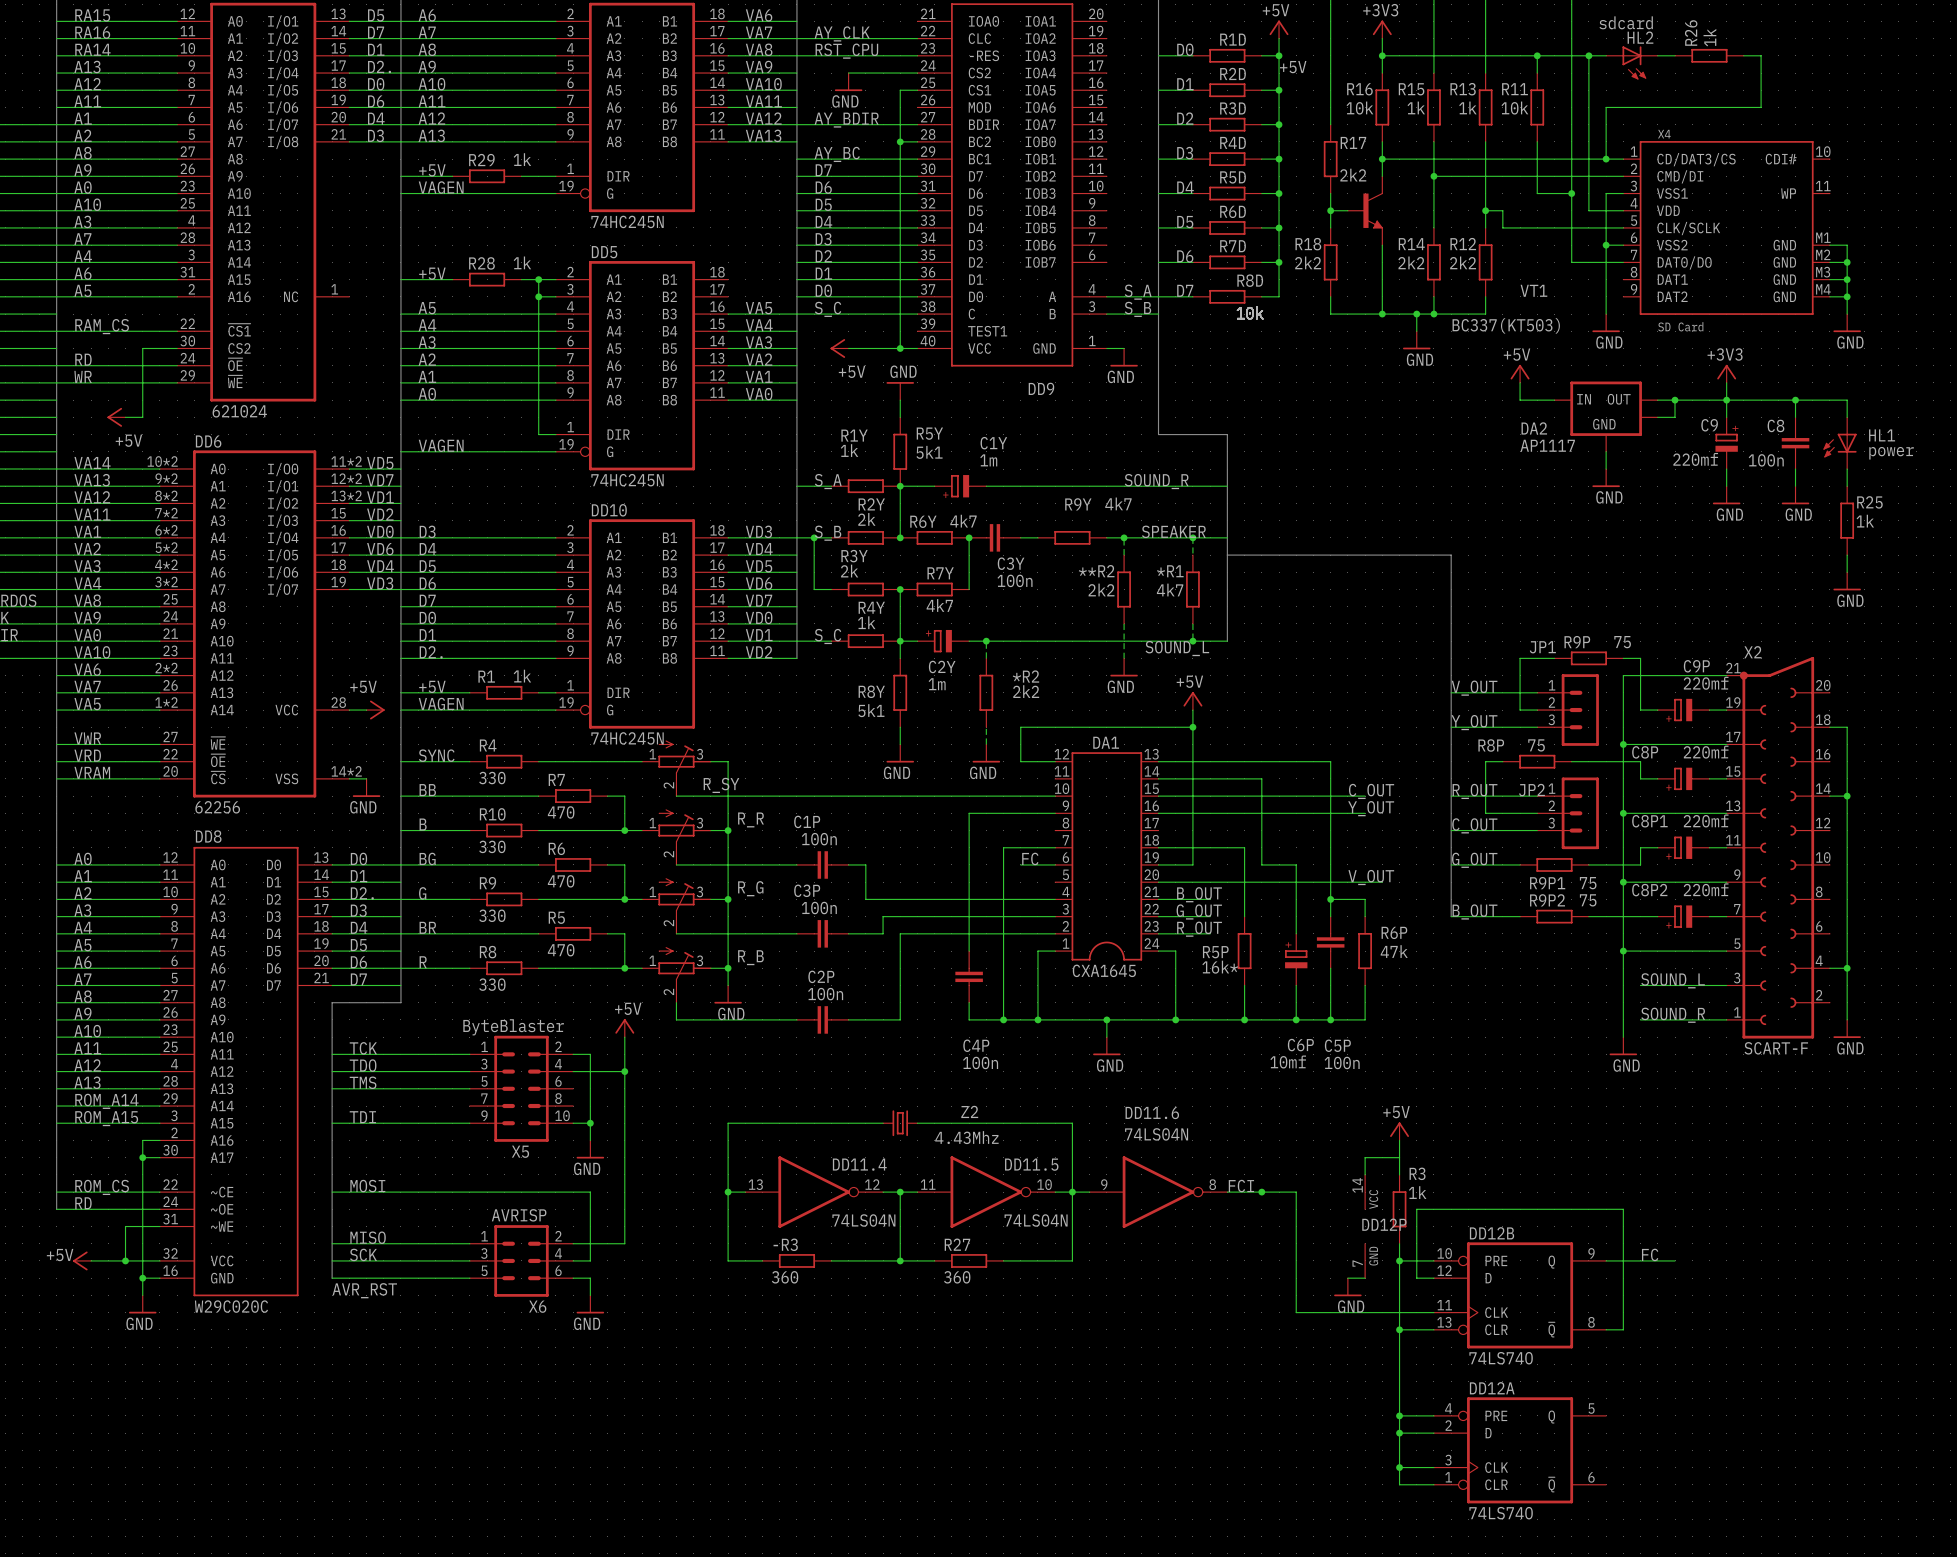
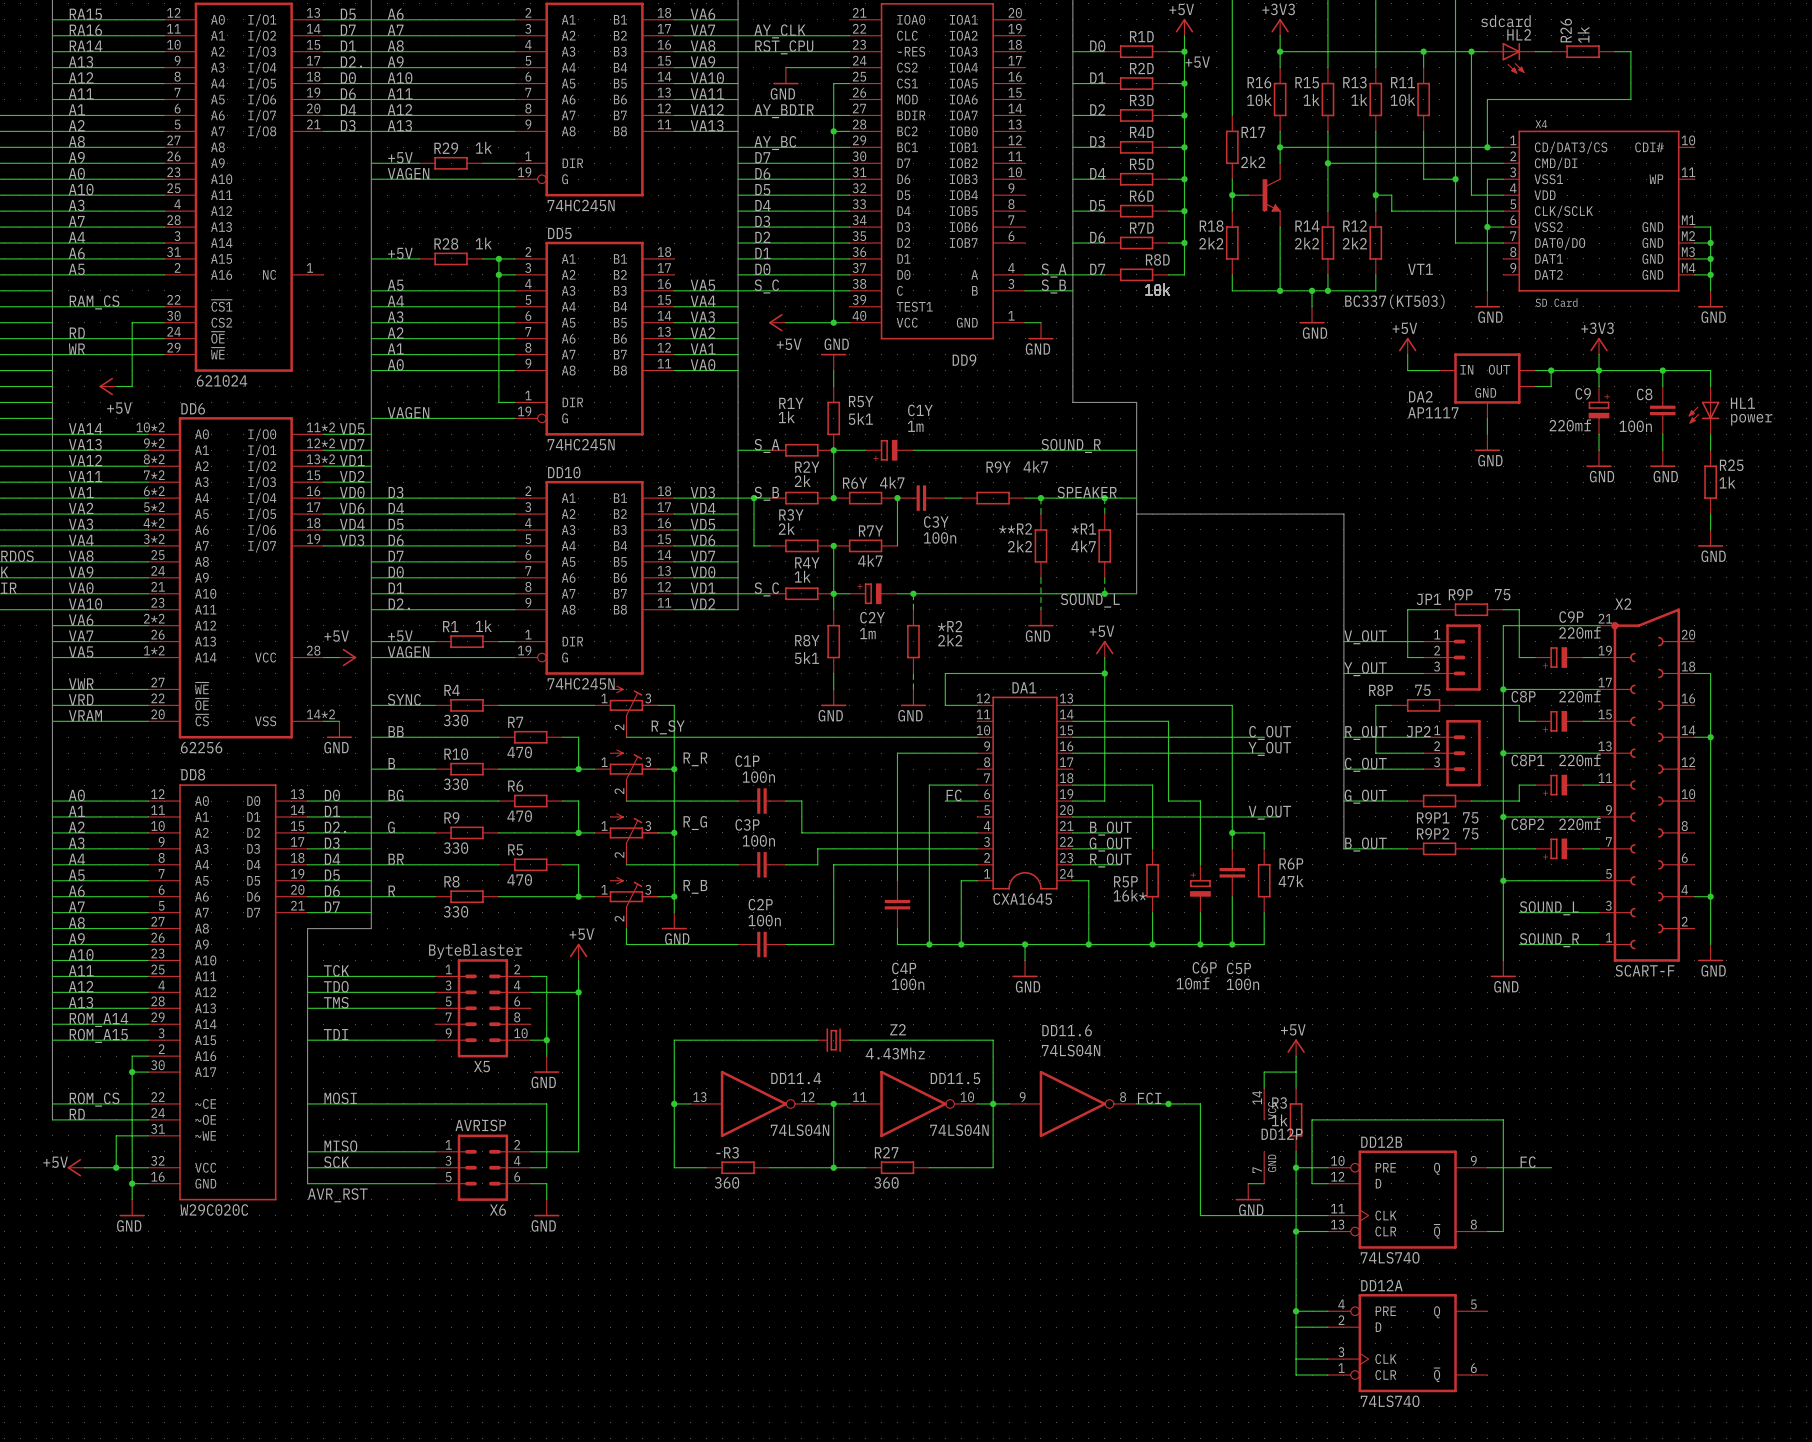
R3 name position: R3 (1417, 1173) -> R3 (1279, 1103)
R3 value position: 1k (1417, 1192) -> 1k (1279, 1120)
junction: (1399, 1433) -> none
junction: (1399, 1467) -> none

